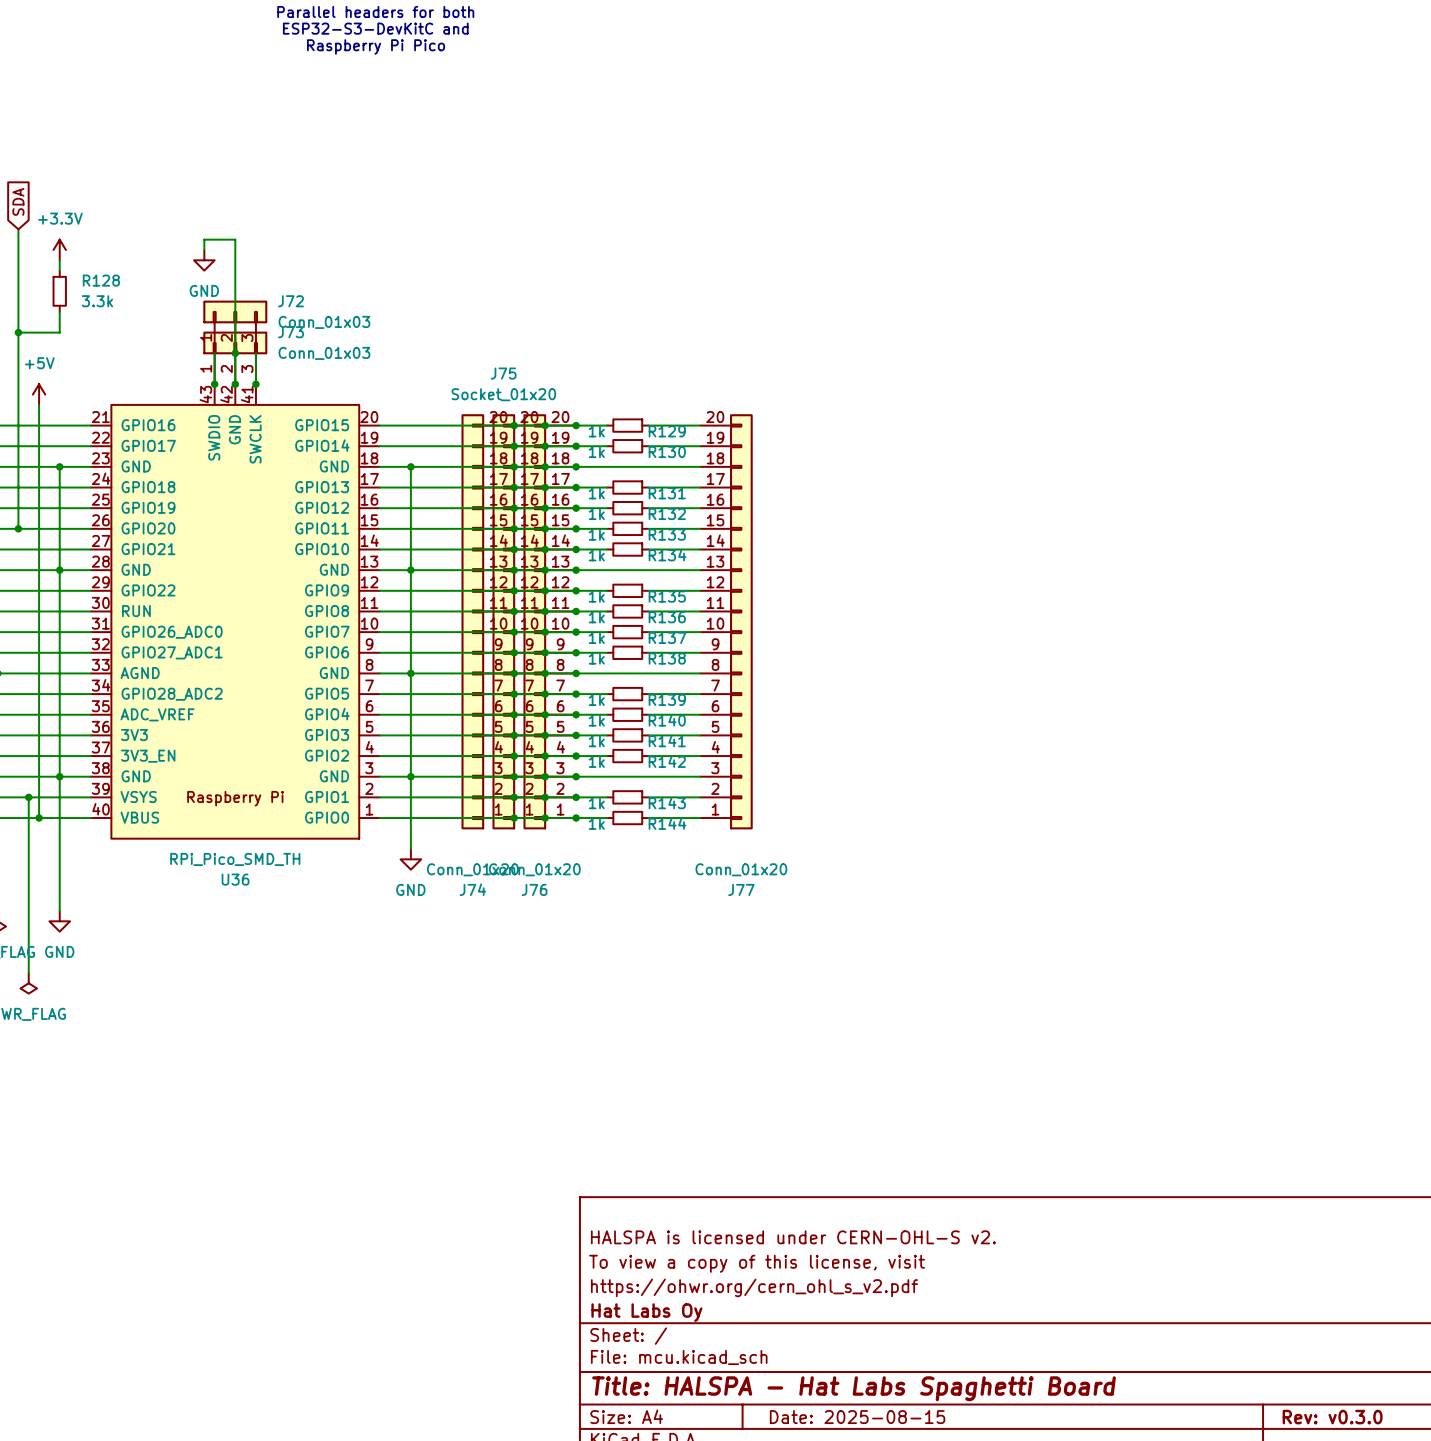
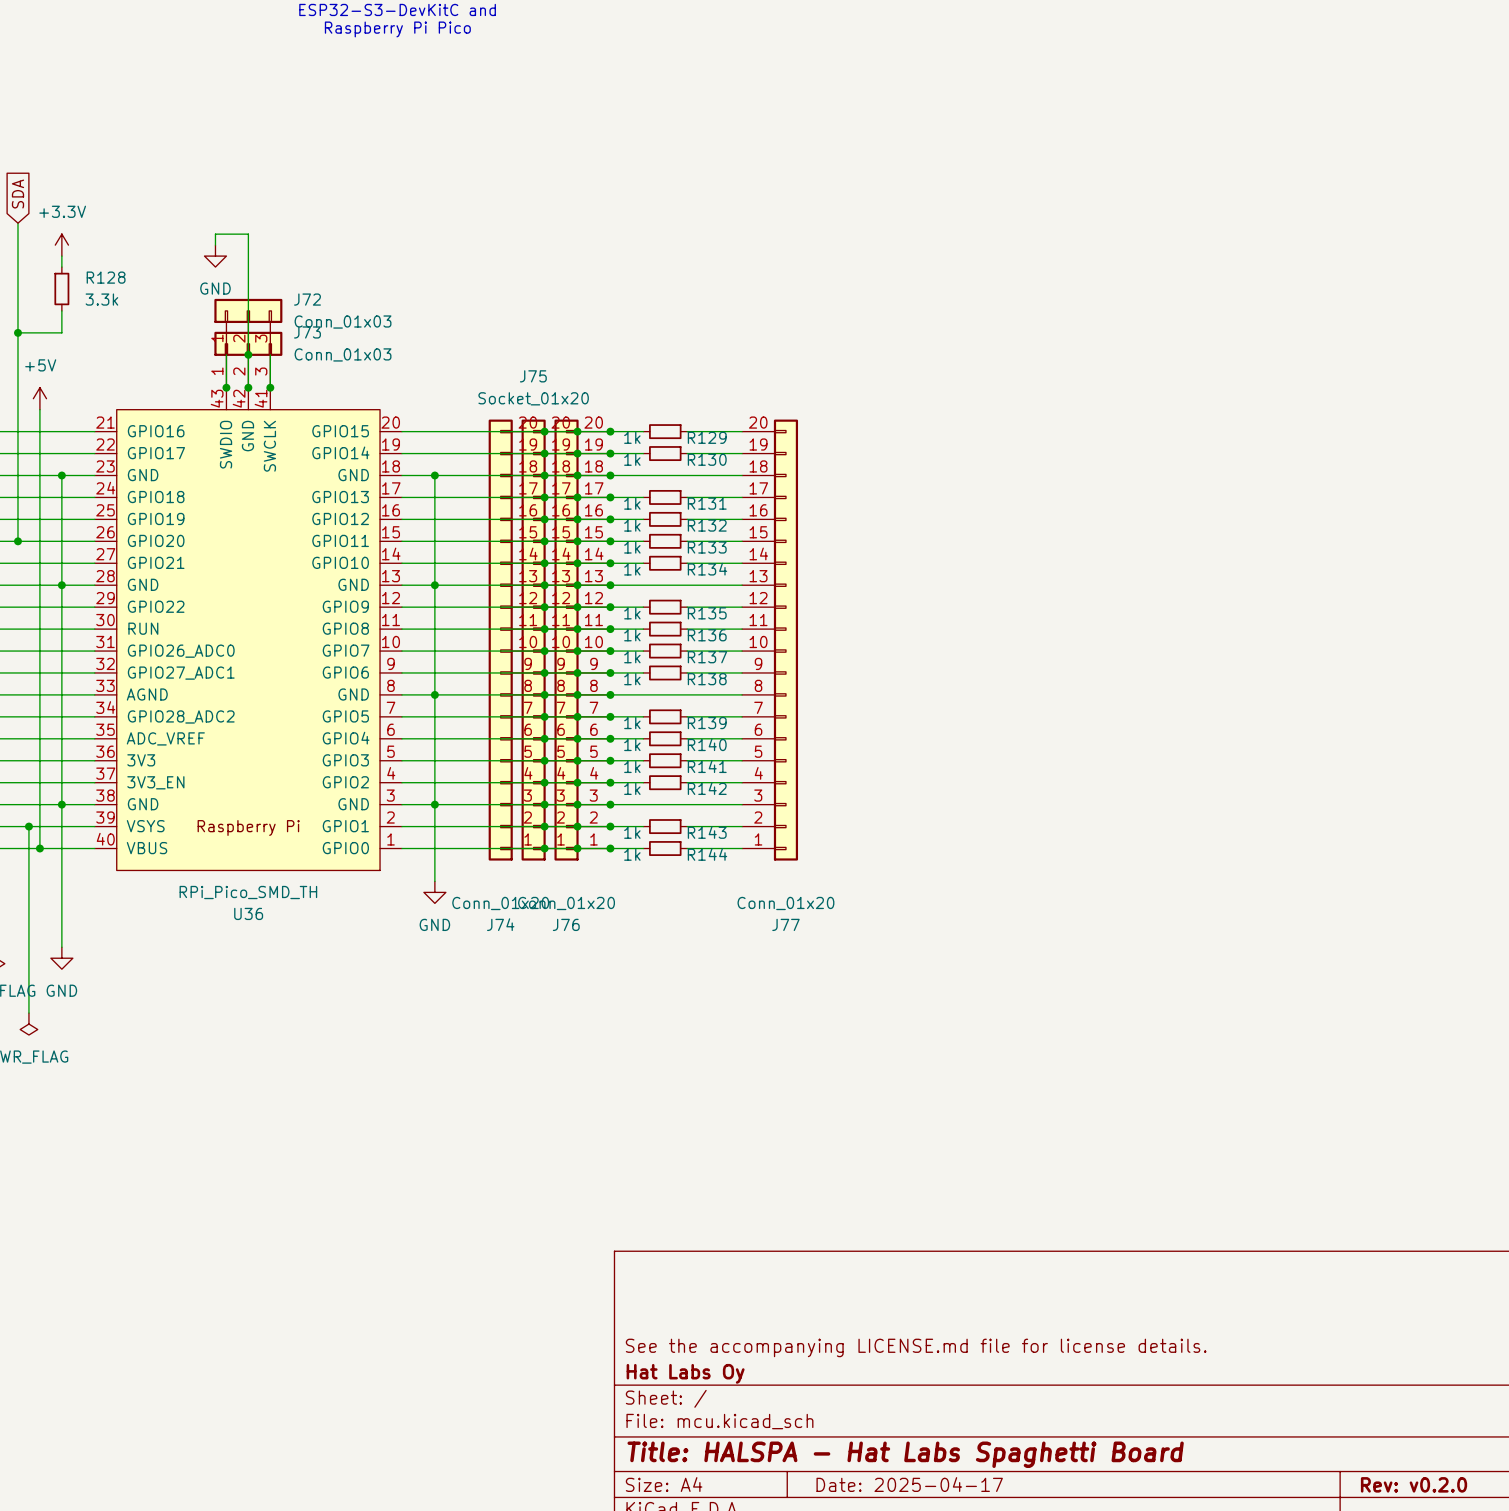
title block: HALSPA is licensed under CERN-OHL-S v2. (793, 1237) -> none
title block: To view a copy of this license, visit (757, 1263) -> none
title block: https://ohwr.org/cern_ohl_s_v2.pdf (754, 1287) -> See the accompanying LICENSE.md file for license details. (916, 1347)
title block: Date: 2025-08-15 (857, 1417) -> Date: 2025-04-17 (909, 1484)
title block: Rev: v0.3.0 (1332, 1417) -> Rev: v0.2.0 (1414, 1484)

